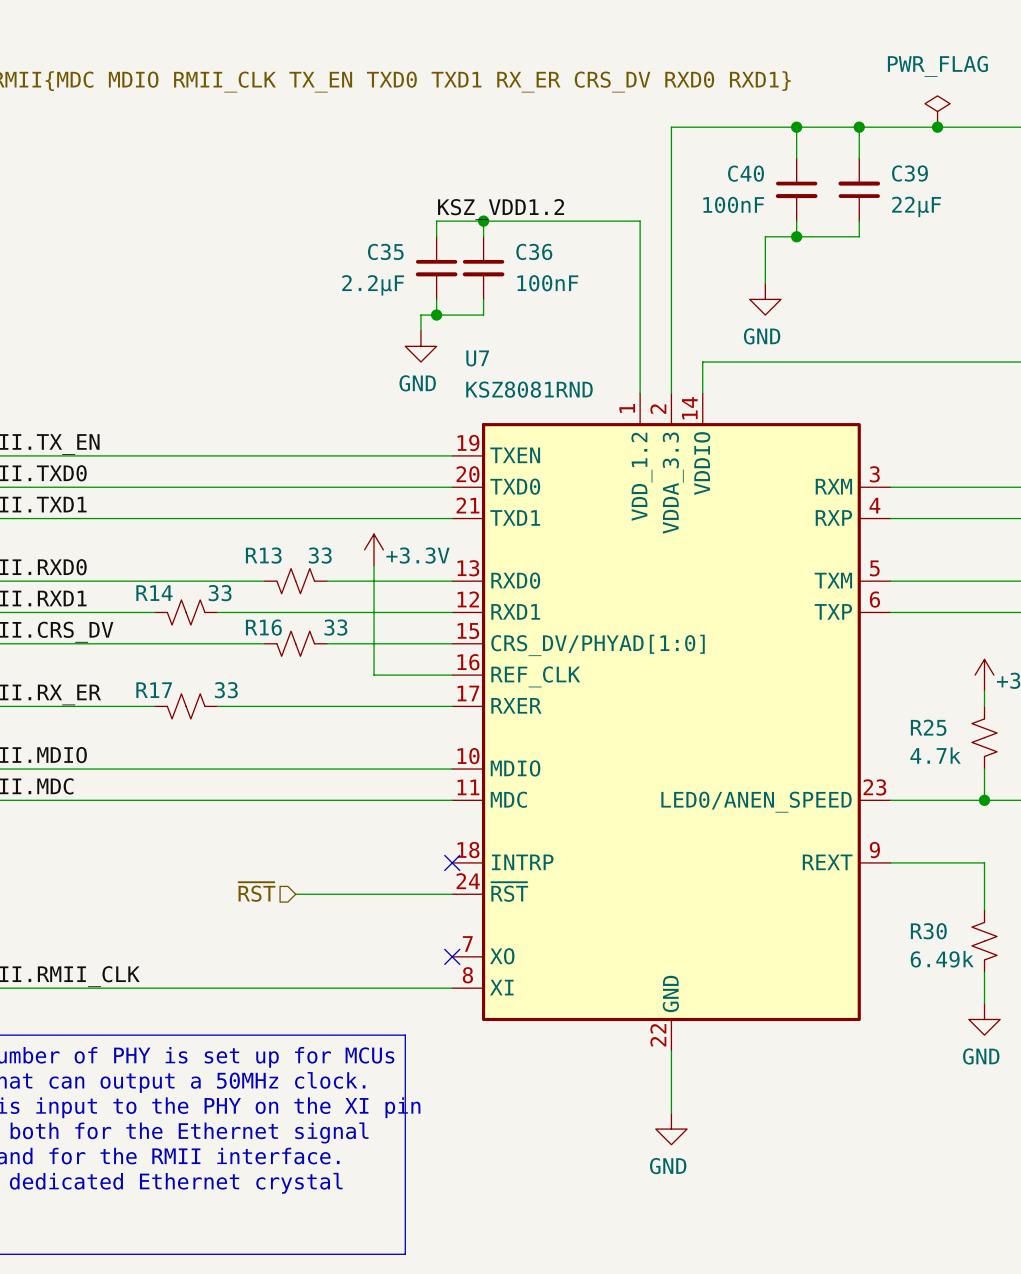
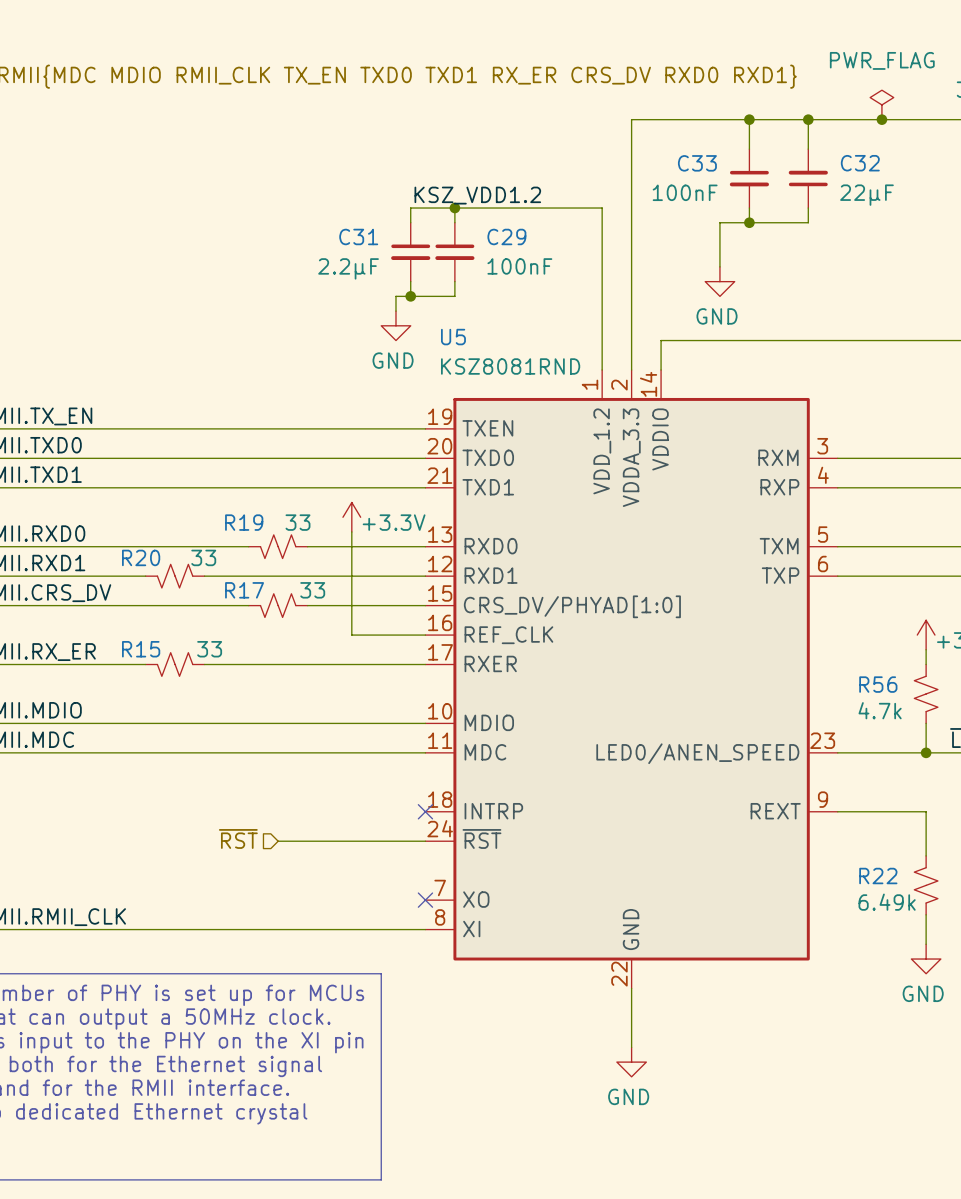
C40 name: C40 (745, 173) -> C33 (697, 163)
C39 name: C39 (909, 173) -> C32 (860, 163)
C35 name: C35 (385, 251) -> C31 (358, 236)
C36 name: C36 (534, 251) -> C29 (506, 236)
U7 name: U7 (477, 358) -> U5 (453, 337)
R13 name: R13 (263, 555) -> R19 (244, 522)
R14 name: R14 (154, 593) -> R20 (141, 557)
R16 name: R16 (263, 627) -> R17 (244, 590)
R17 name: R17 (154, 690) -> R15 (141, 649)
R25 name: R25 (928, 727) -> R56 (878, 684)
R30 name: R30 (928, 931) -> R22 (878, 876)

